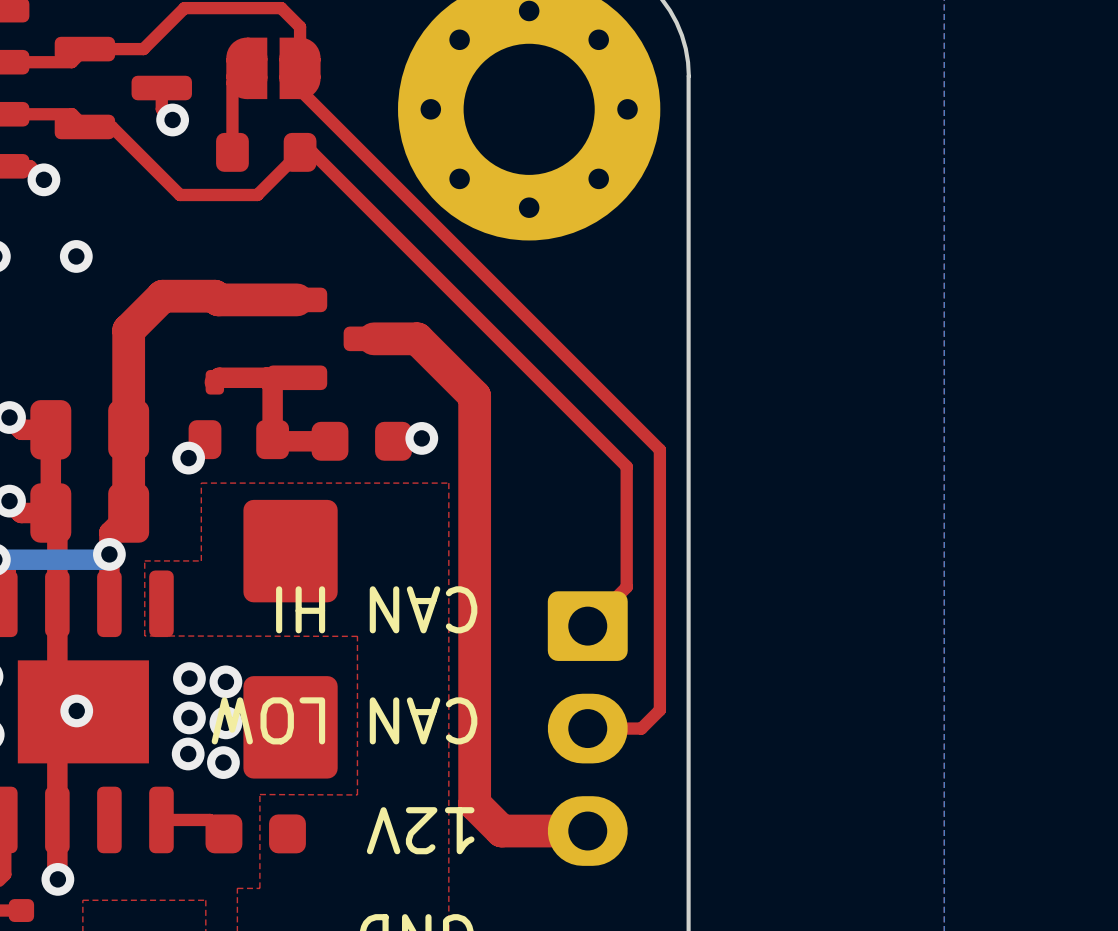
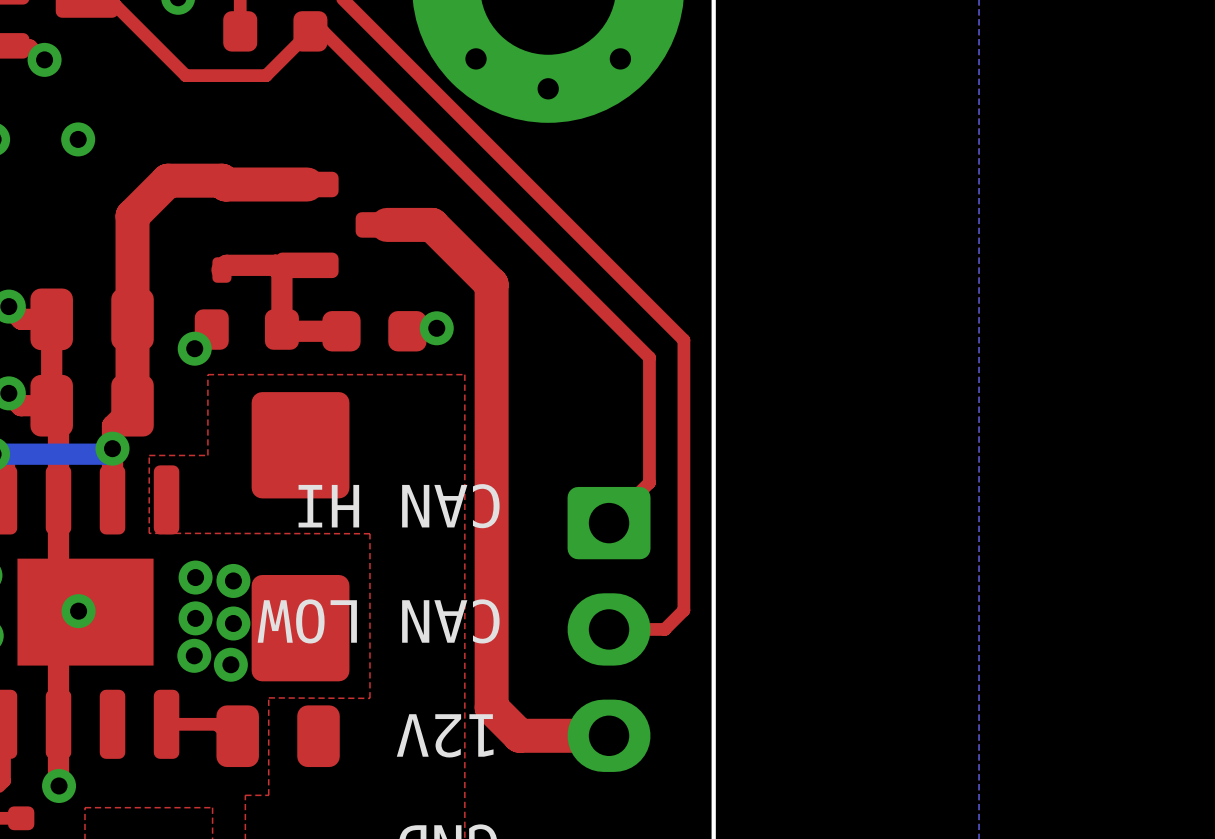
part footprint: [205, 814, 306, 854] -> [216, 705, 340, 768]

